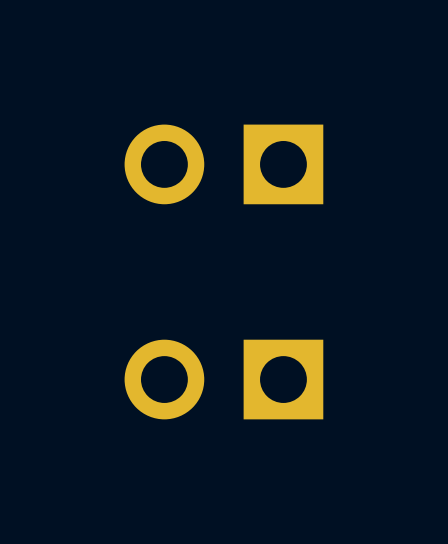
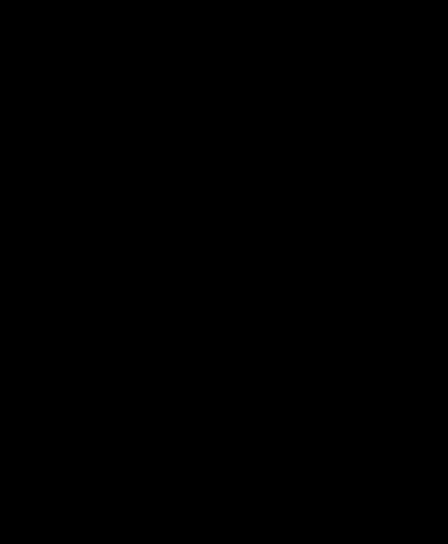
part: (223, 164) -> none
part: (223, 379) -> none

